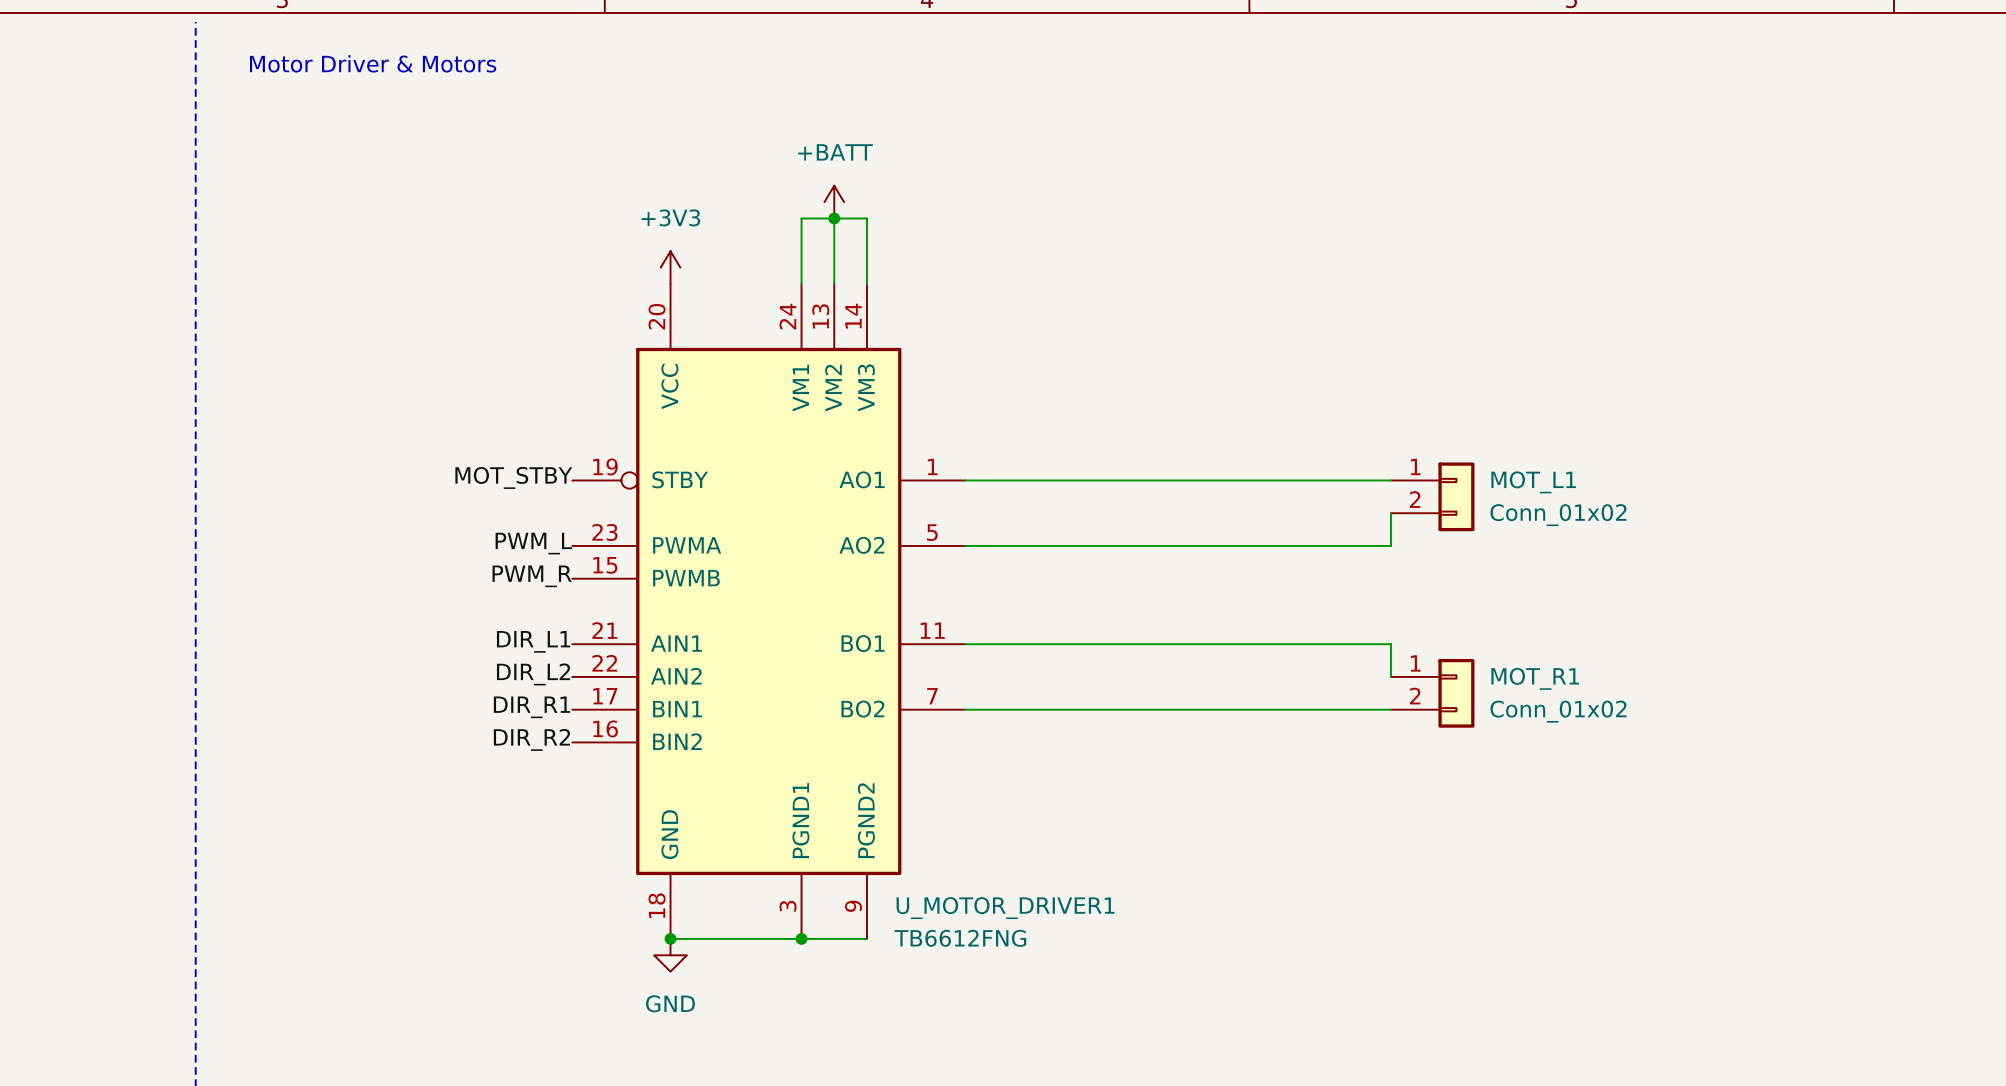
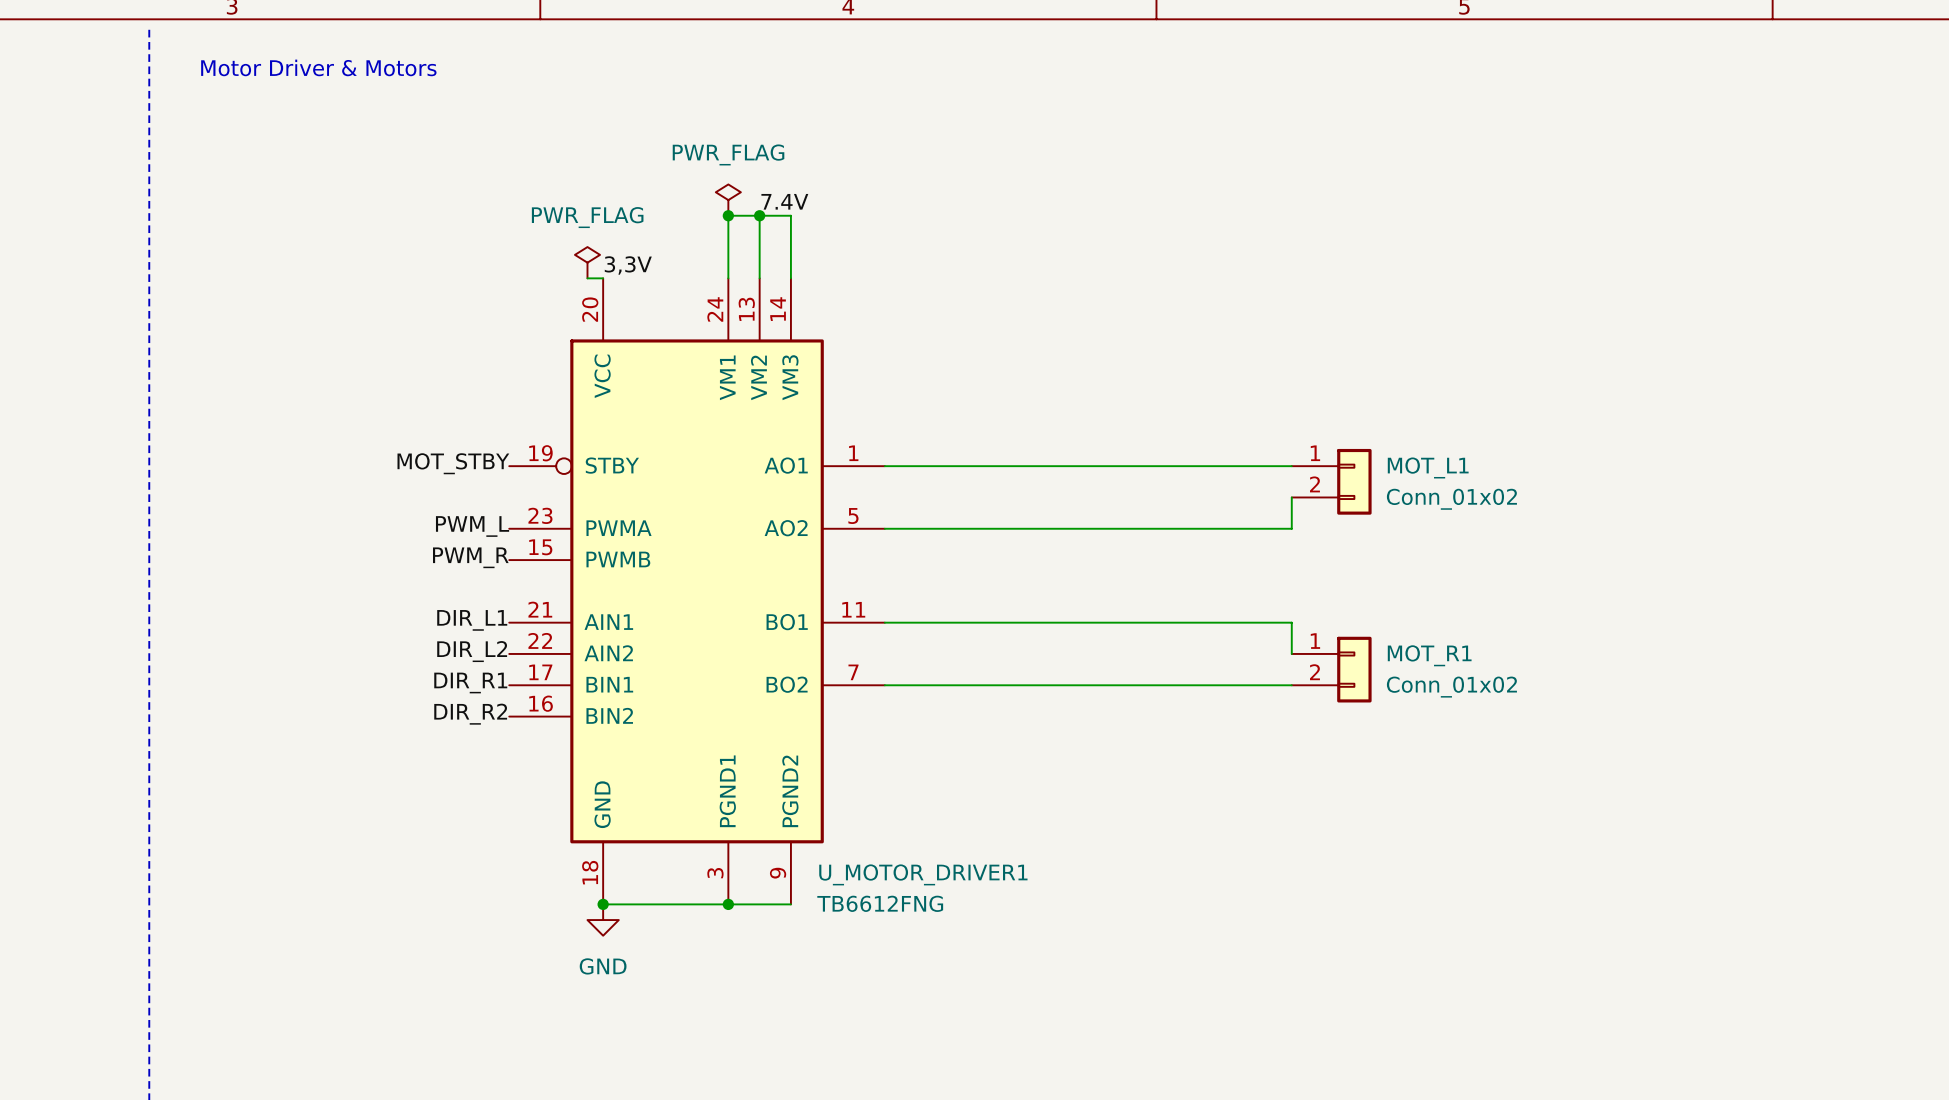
power symbol: none -> PWR_FLAG (728, 200)
power symbol: +BATT (834, 202) -> none
label: none -> 7.4V (784, 201)
junction: none -> (728, 215)
power symbol: none -> PWR_FLAG (587, 262)
power symbol: +3V3 (670, 267) -> none
label: none -> 3,3V (628, 265)
wire: none -> (587, 278) (603, 278)

